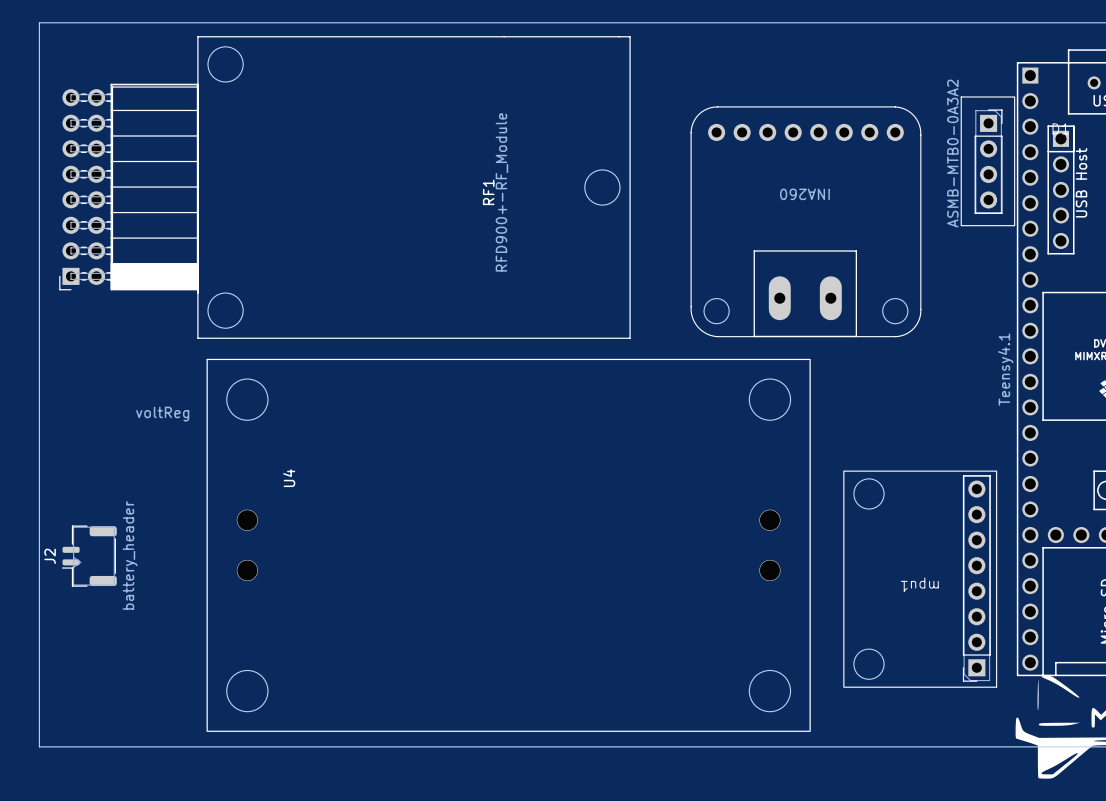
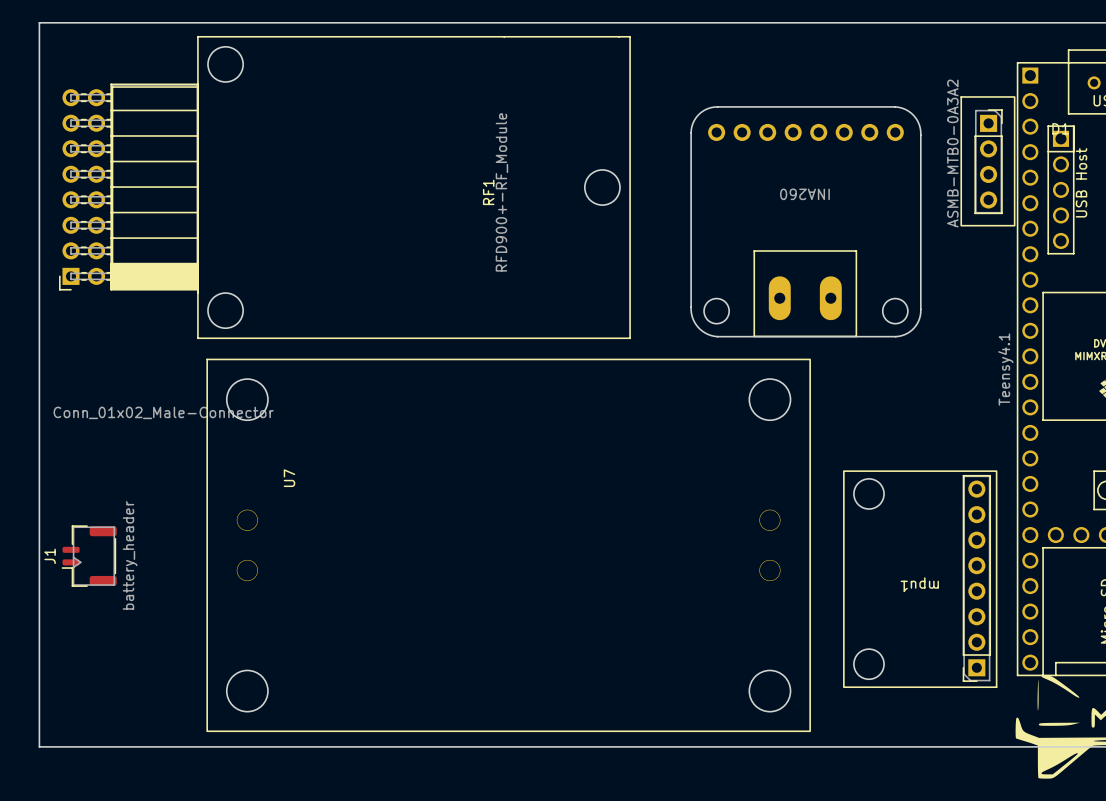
part footprint: [690, 106, 922, 338] -> [690, 106, 922, 338]
U4 value: voltReg (162, 414) -> Conn_01x02_Male-Connector (163, 412)
U4 name: U4 (289, 478) -> U7 (289, 478)
J2 name: J2 (50, 556) -> J1 (50, 556)

